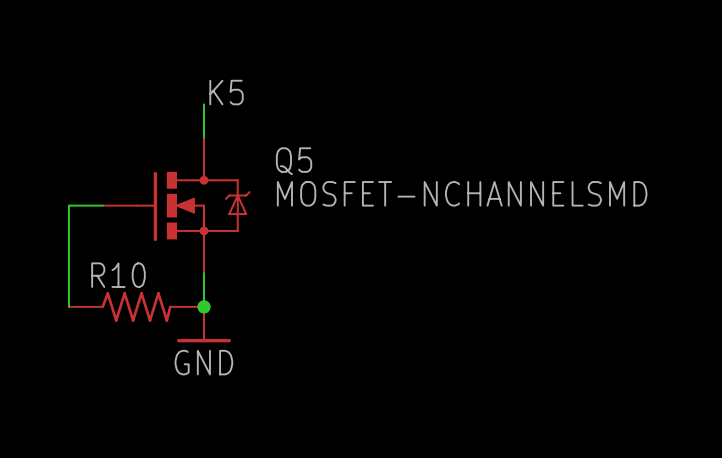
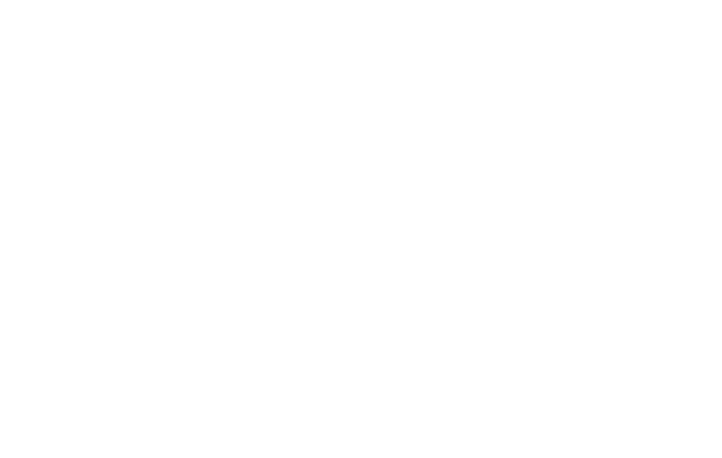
label: K5 (226, 92) -> none
wire: (204, 104) (204, 138) -> none
wire: (102, 205) (68, 205) (68, 306) -> none
Q5: MOSFET-NCHANNELSMD (176, 205) -> none
wire: (204, 273) (204, 306) -> none
R10: (136, 306) -> none
junction: (204, 306) -> none
power symbol: GND (204, 324) -> none

